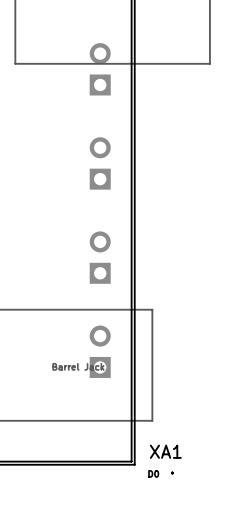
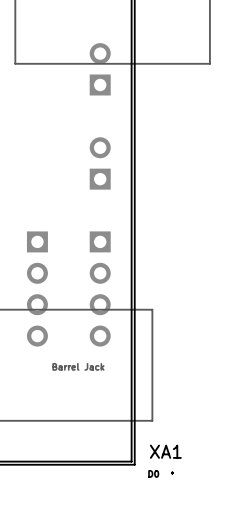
part: (100, 257) -> none
part: none -> (37, 288)
part: none -> (100, 288)
part: (100, 351) -> none

